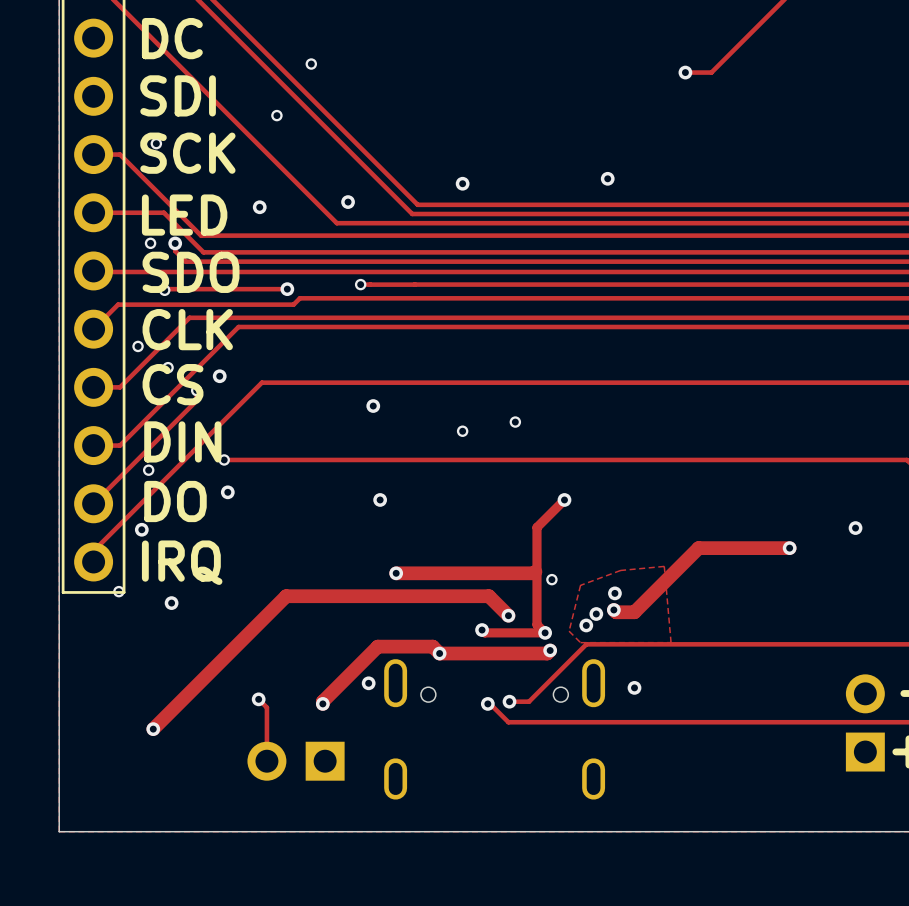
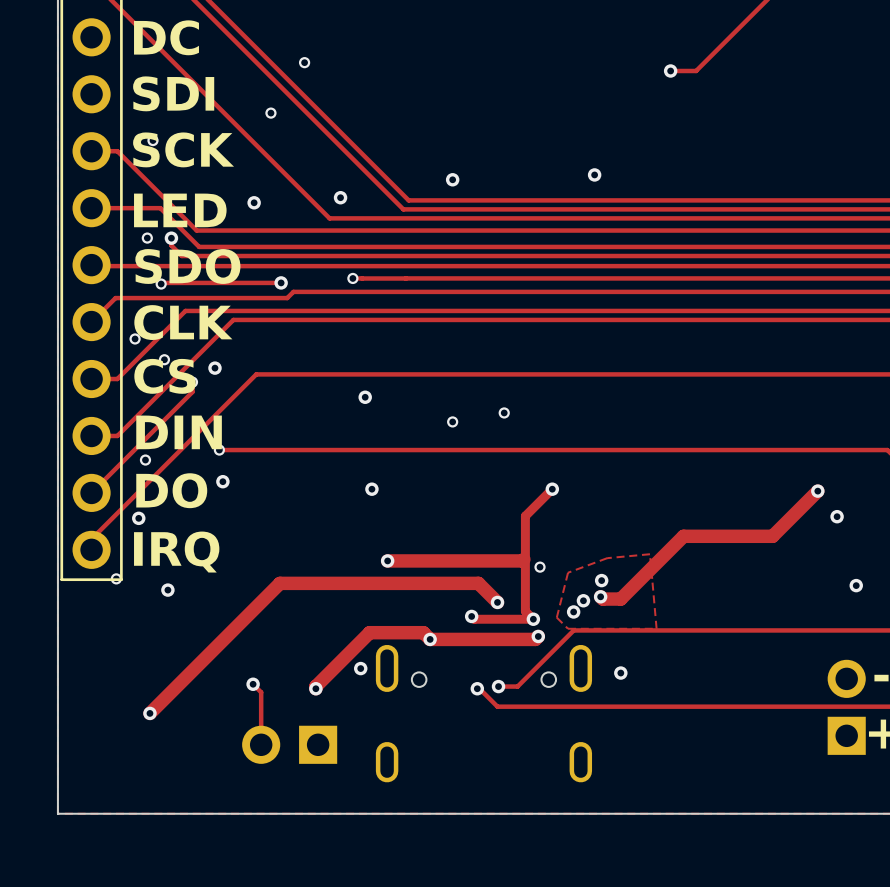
track: none -> (817, 491) (772, 536)
via: none -> (817, 491)
via: (789, 548) -> none
via: none -> (856, 585)

